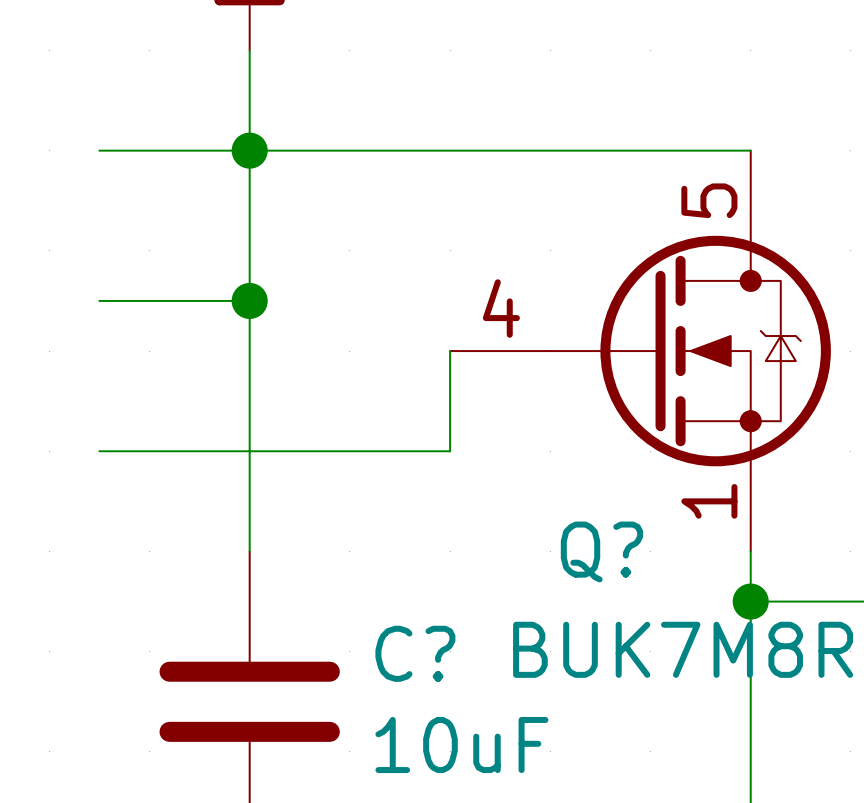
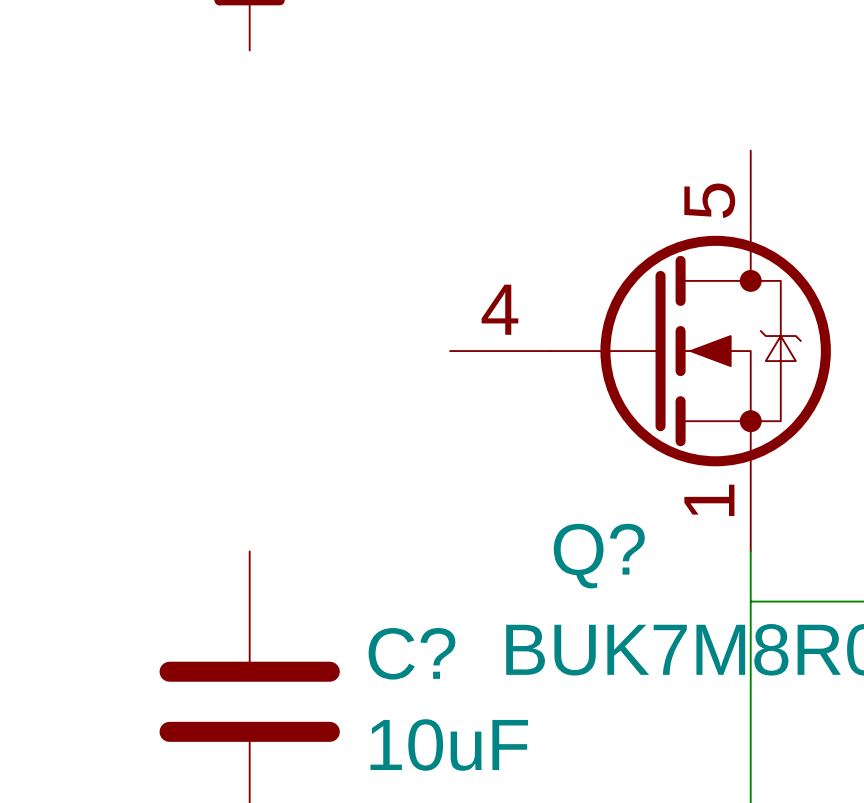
wire: (249, 50) (249, 551) -> none
wire: (99, 150) (750, 150) -> none
junction: (249, 150) -> none
wire: (99, 300) (249, 300) -> none
junction: (249, 300) -> none
wire: (450, 351) (450, 451) (99, 451) -> none
junction: (750, 601) -> none

